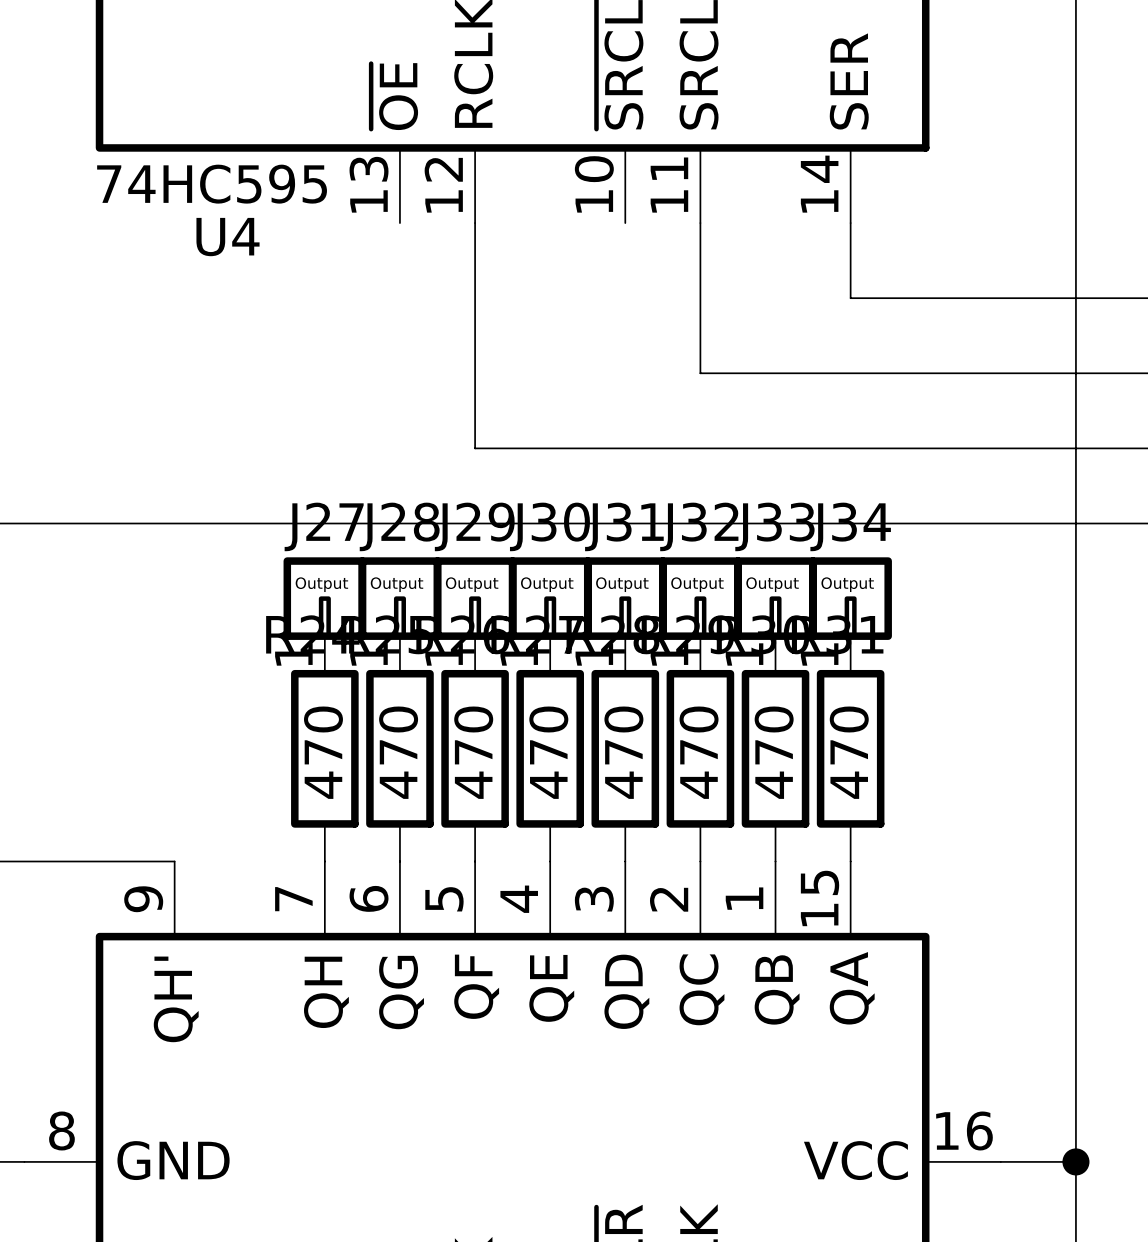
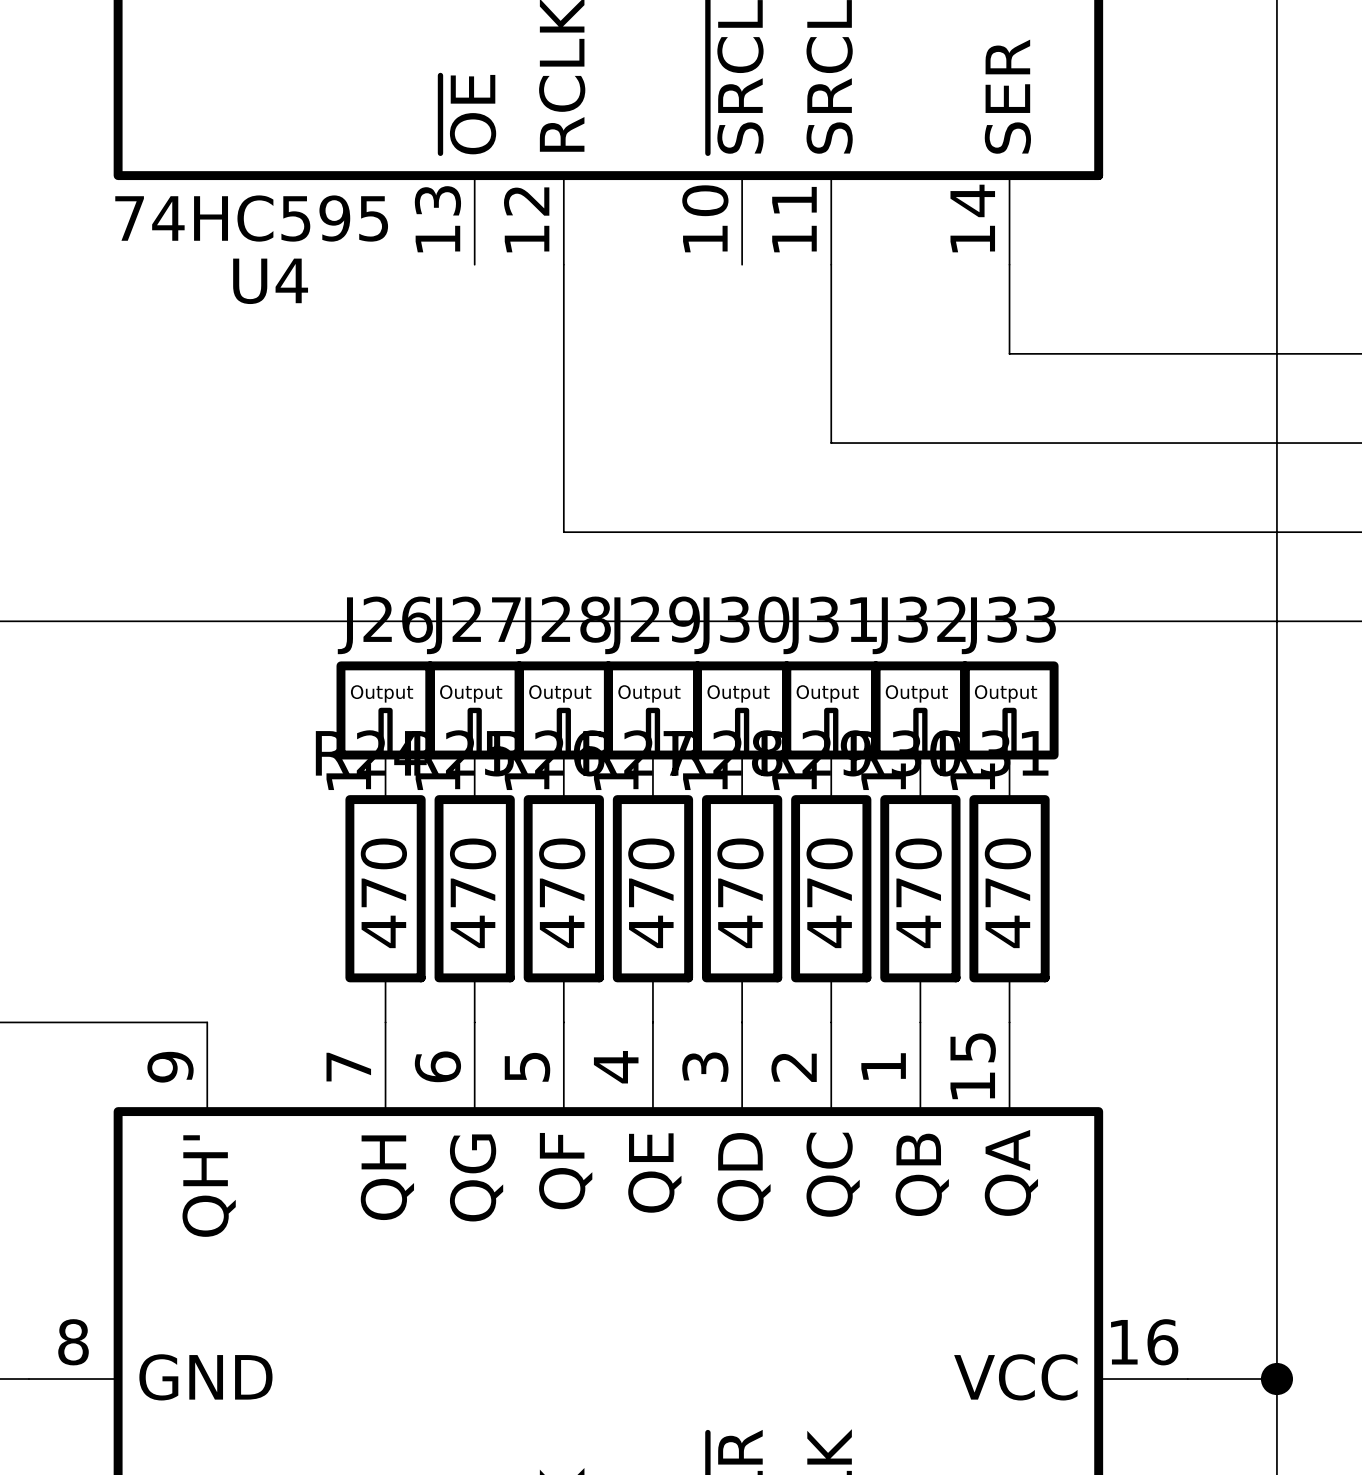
J27 name: J27 (324, 526) -> J26 (385, 625)
J28 name: J28 (399, 526) -> J27 (473, 625)
J29 name: J29 (474, 526) -> J28 (563, 625)
J30 name: J30 (549, 526) -> J29 (652, 625)
J31 name: J31 (624, 526) -> J30 (741, 625)
J32 name: J32 (699, 526) -> J31 (830, 625)
J33 name: J33 (774, 526) -> J32 (919, 625)
J34 name: J34 (850, 526) -> J33 (1008, 625)

